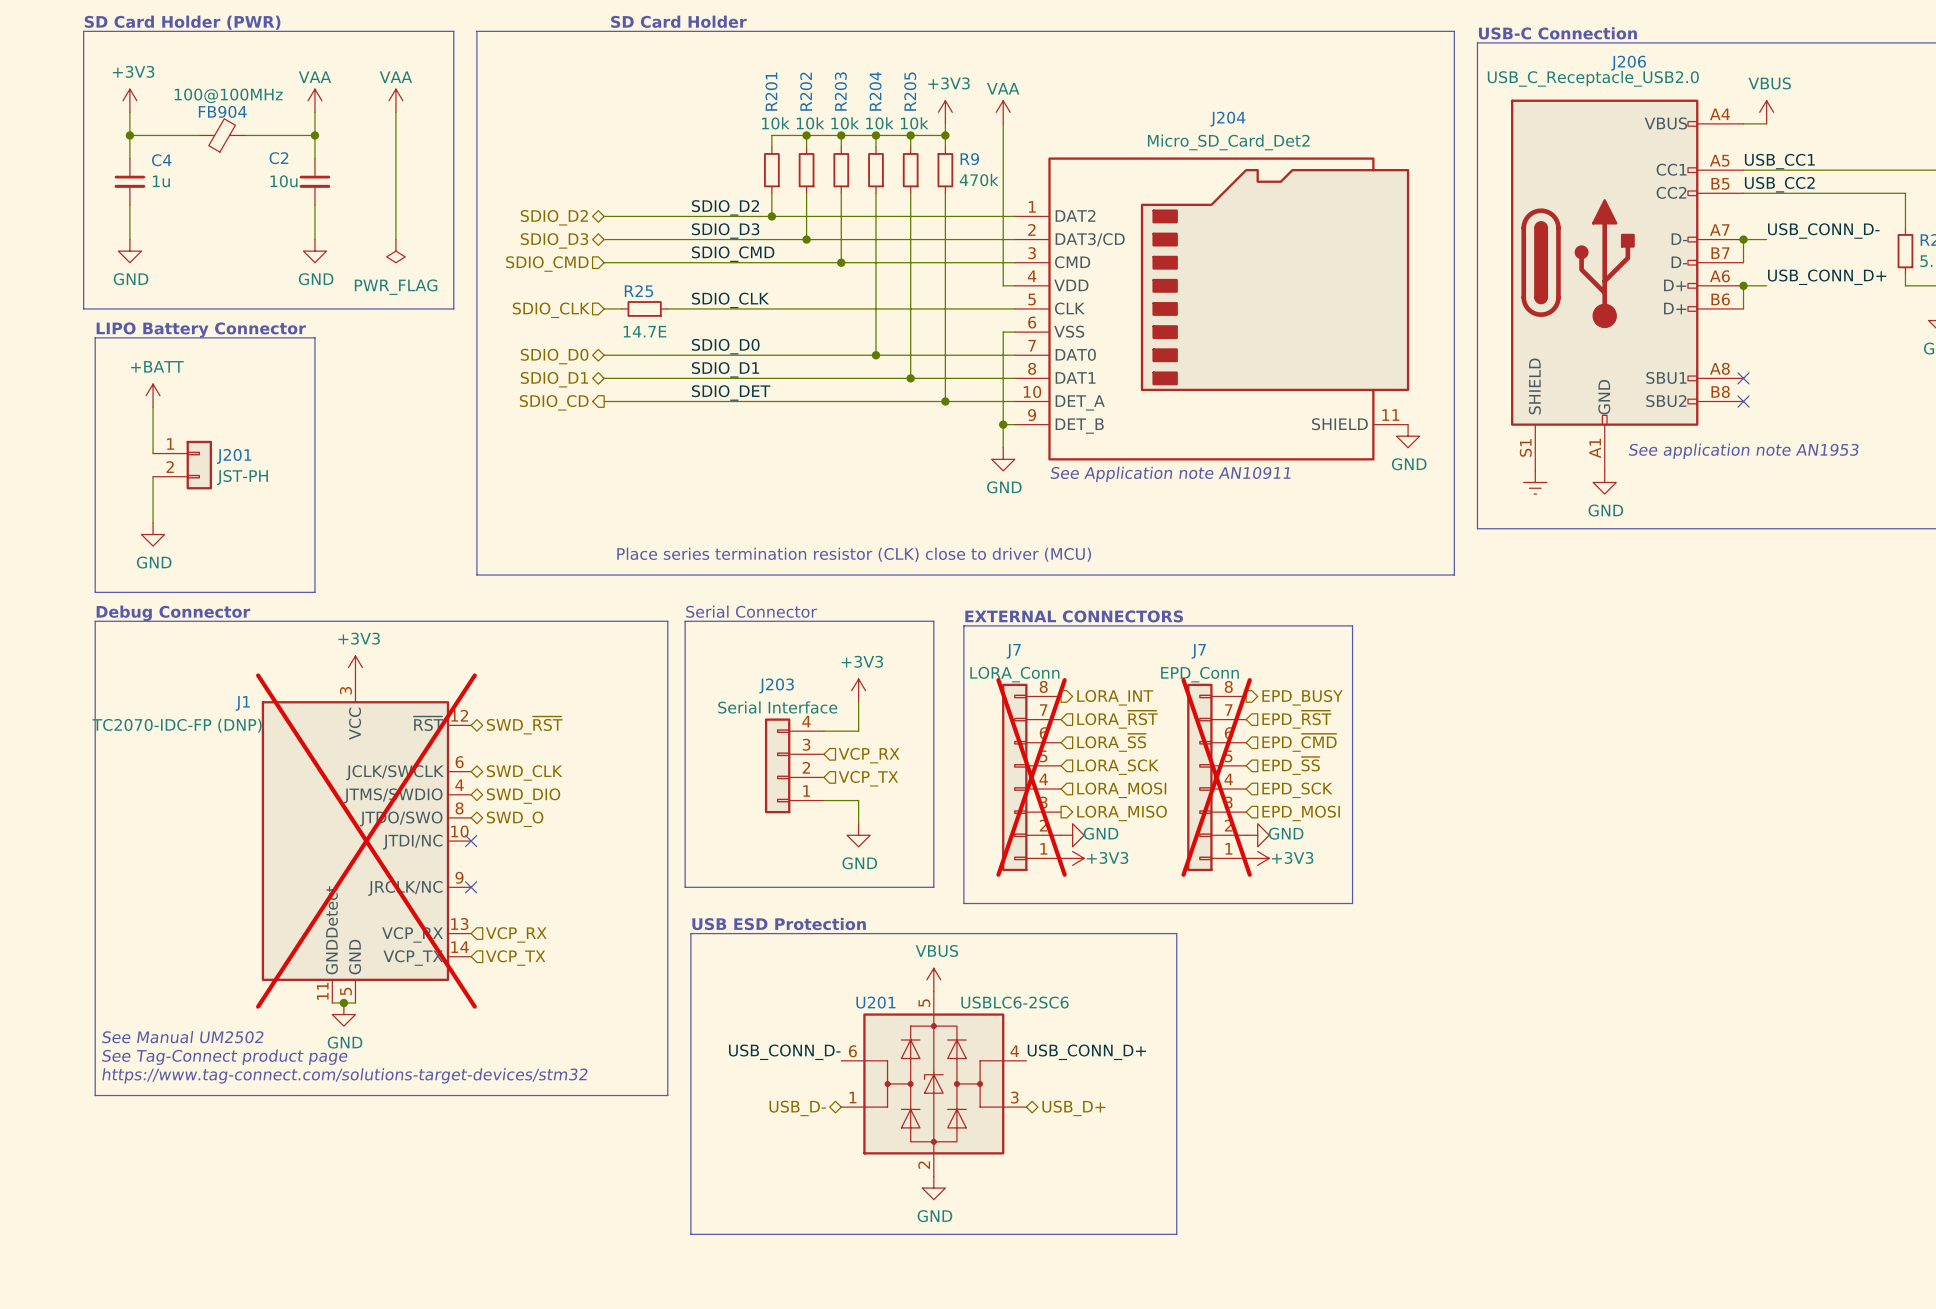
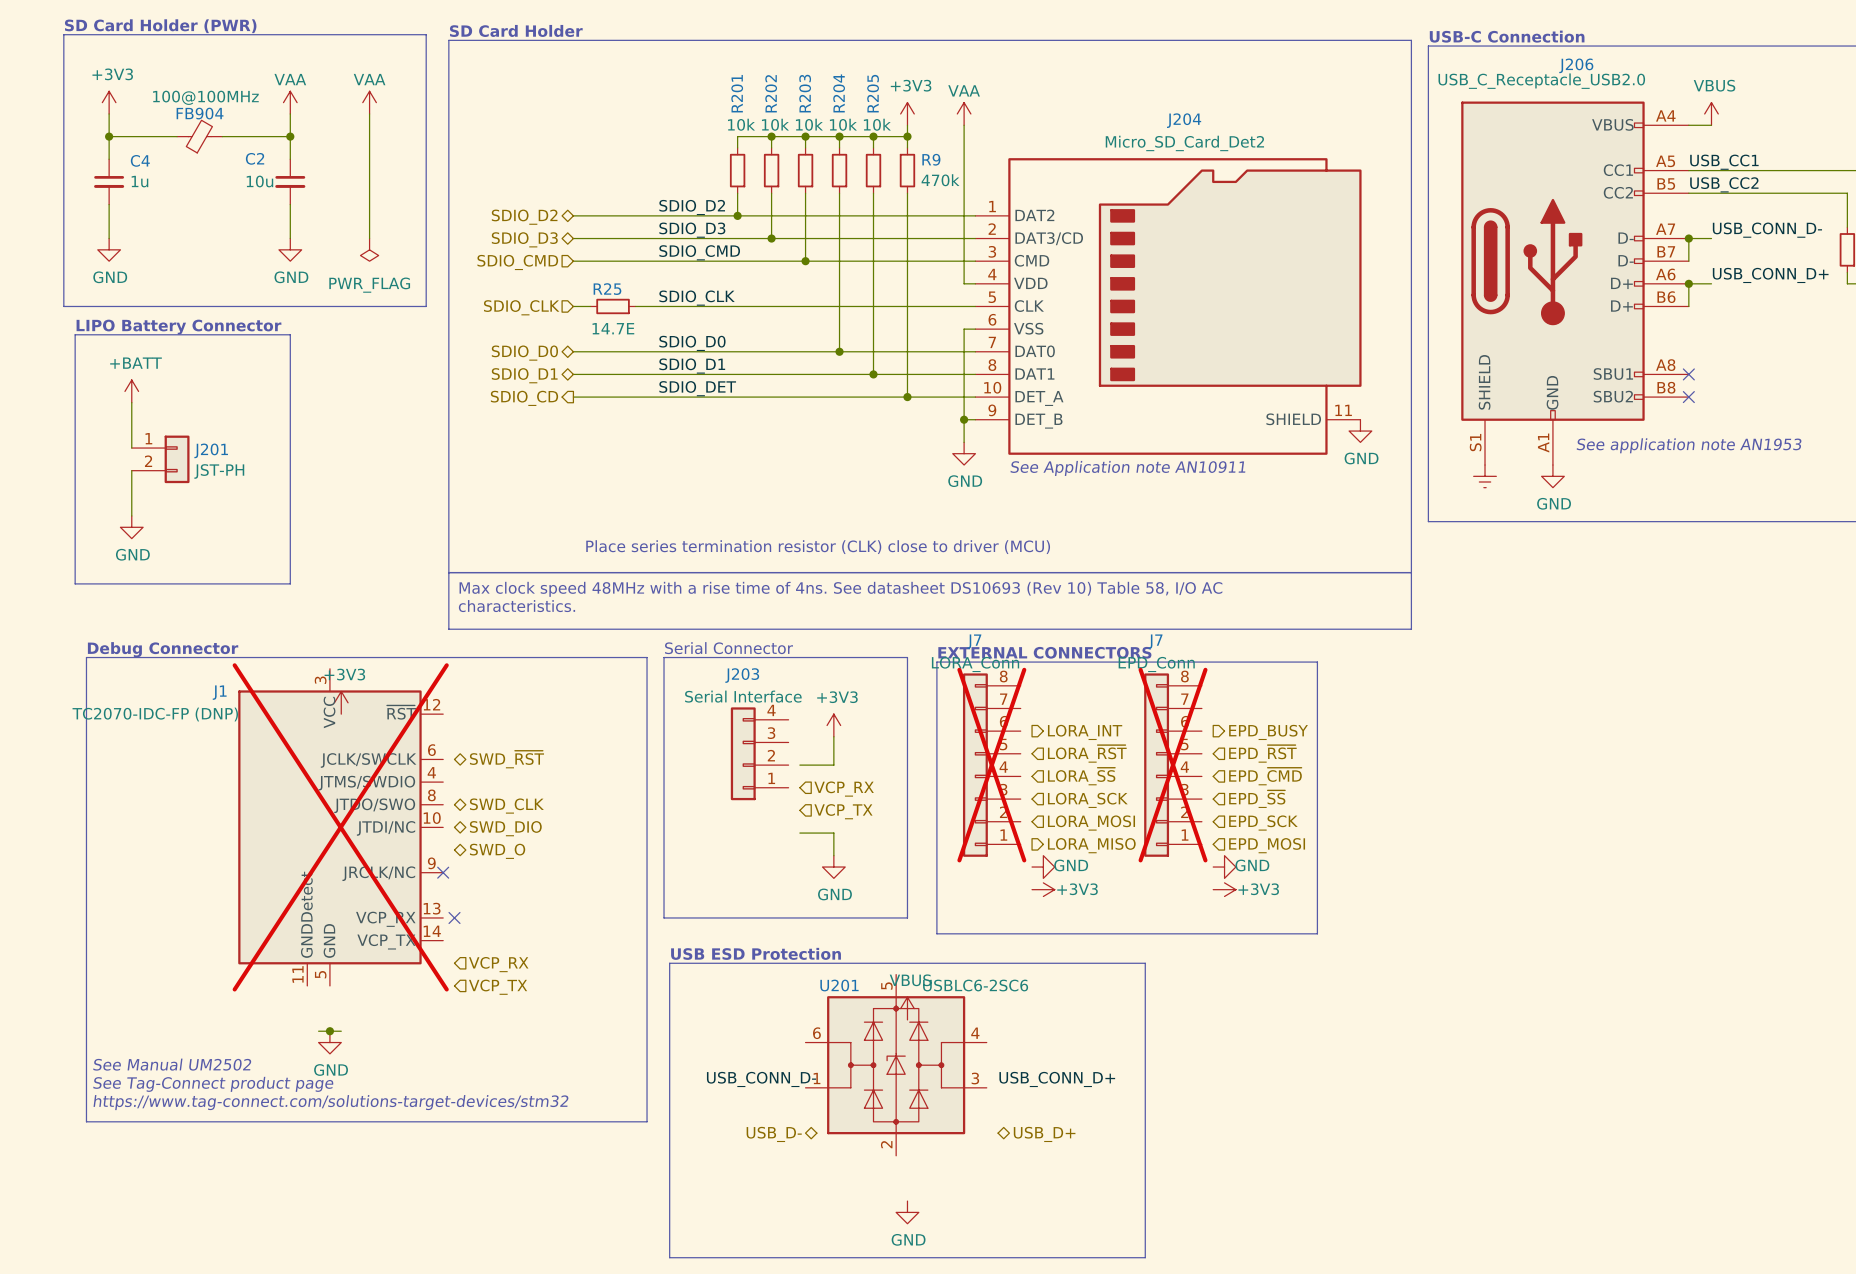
text position: SD Card Holder (678, 21) -> SD Card Holder (516, 30)
line: (476, 37) (476, 31) (1454, 31) (1454, 575) (476, 575) -> (448, 40) (1411, 40) (1411, 629) (448, 629) (448, 566)
line: none -> (448, 572) (1411, 572)
text: none -> Max clock speed 48MHz with a rise time of 4ns. See datasheet DS10693 (Rev 10) Table 58, I/O AC (840, 589)
text position: Serial Connector (751, 611) -> Serial Connector (729, 648)
text position: Debug Connector (173, 613) -> Debug Connector (163, 649)
text: none -> characteristics. (516, 606)
text position: EXTERNAL CONNECTORS (1074, 616) -> EXTERNAL CONNECTORS (1044, 652)
line: (95, 621) (95, 1095) (667, 1095) (667, 621) (95, 621) -> (86, 657) (86, 1121) (647, 1121) (647, 657) (86, 657)
line: (685, 621) (933, 621) (933, 887) (685, 887) (685, 621) -> none
line: (963, 625) (1352, 625) (1352, 903) (963, 903) (963, 625) -> (936, 662) (1317, 662) (1317, 933) (936, 933) (936, 662)
power symbol position: +3V3 (355, 667) -> +3V3 (341, 702)
power symbol position: +3V3 (858, 690) -> +3V3 (833, 725)
hierarchical label position: LORA_INT (1115, 697) -> LORA_INT (1085, 732)
hierarchical label position: EPD_BUSY (1302, 697) -> EPD_BUSY (1268, 732)
wire: (858, 702) (858, 731) (823, 731) -> (833, 736) (833, 765) (799, 765)
hierarchical label position: LORA_~{RST} (1117, 719) -> LORA_~{RST} (1087, 753)
hierarchical label position: EPD_~{RST} (1296, 719) -> EPD_~{RST} (1262, 753)
hierarchical label position: SWD_~{RST} (524, 725) -> SWD_~{RST} (506, 759)
hierarchical label position: LORA_~{SS} (1111, 742) -> LORA_~{SS} (1081, 776)
hierarchical label position: EPD_~{CMD} (1299, 742) -> EPD_~{CMD} (1265, 776)
hierarchical label position: VCP_RX (869, 755) -> VCP_RX (844, 789)
hierarchical label position: EPD_~{SS} (1291, 765) -> EPD_~{SS} (1257, 799)
hierarchical label position: LORA_SCK (1118, 767) -> LORA_SCK (1087, 800)
hierarchical label position: SWD_CLK (524, 772) -> SWD_CLK (506, 806)
hierarchical label position: VCP_TX (868, 778) -> VCP_TX (843, 811)
hierarchical label position: LORA_MOSI (1121, 790) -> LORA_MOSI (1091, 823)
hierarchical label position: EPD_SCK (1297, 790) -> EPD_SCK (1263, 823)
hierarchical label position: SWD_DIO (523, 796) -> SWD_DIO (505, 828)
wire: (823, 800) (858, 800) (858, 823) -> (799, 833) (833, 833) (833, 855)
hierarchical label position: LORA_MISO (1122, 813) -> LORA_MISO (1091, 845)
hierarchical label position: EPD_MOSI (1301, 813) -> EPD_MOSI (1267, 845)
hierarchical label position: SWD_O (515, 819) -> SWD_O (497, 851)
power symbol position: GND (858, 835) -> GND (833, 867)
power symbol position: GND (1072, 835) -> GND (1043, 867)
power symbol position: GND (1257, 835) -> GND (1224, 867)
no-connect mark: (471, 841) -> none
power symbol position: +3V3 (1072, 858) -> +3V3 (1043, 889)
power symbol position: +3V3 (1257, 858) -> +3V3 (1224, 889)
text position: USB ESD Protection (779, 923) -> USB ESD Protection (756, 953)
no-connect mark: none -> (454, 917)
line: (696, 933) (690, 933) (690, 1234) (1176, 1234) (1176, 933) (945, 933) -> (664, 917) (664, 657) (907, 657) (907, 917)
hierarchical label position: VCP_RX (516, 934) -> VCP_RX (498, 964)
hierarchical label position: VCP_TX (515, 958) -> VCP_TX (498, 987)
line: none -> (669, 963) (1145, 963) (1145, 1257) (669, 1257) (669, 963)
power symbol position: VBUS (933, 979) -> VBUS (907, 1008)
wire: (332, 1002) (355, 1002) -> (318, 1031) (341, 1031)
junction position: (343, 1002) -> (329, 1031)
power symbol position: GND (343, 1014) -> GND (329, 1042)
text position: See Manual UM2502 (182, 1037) -> See Manual UM2502 (172, 1064)
label position: USB_CONN_D- (784, 1052) -> USB_CONN_D- (761, 1079)
label position: USB_CONN_D+ (1086, 1052) -> USB_CONN_D+ (1057, 1079)
text position: See Tag-Connect product page (224, 1057) -> See Tag-Connect product page (213, 1084)
text position: https://www.tag-connect.com/solutions-target-devices/stm32 (345, 1075) -> https://www.tag-connect.com/solutions-target-devices/stm32 (331, 1102)
hierarchical label position: USB_D- (797, 1108) -> USB_D- (774, 1134)
hierarchical label position: USB_D+ (1073, 1108) -> USB_D+ (1044, 1134)
power symbol position: GND (933, 1188) -> GND (907, 1212)

